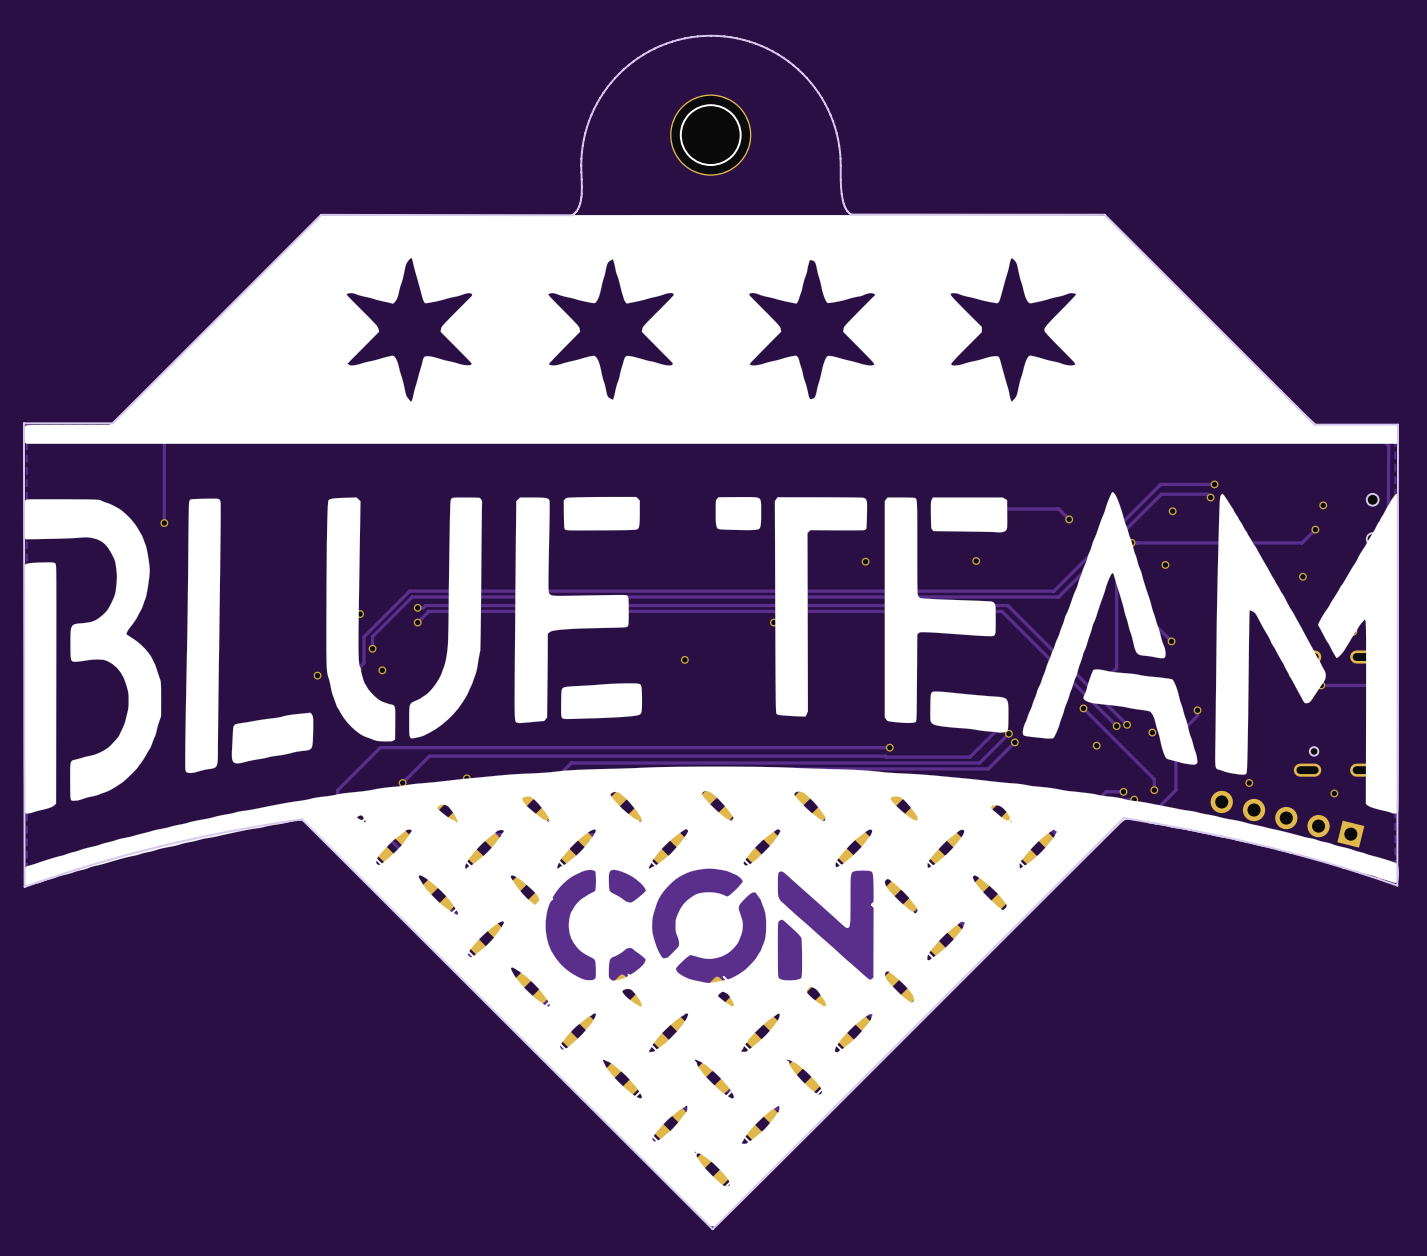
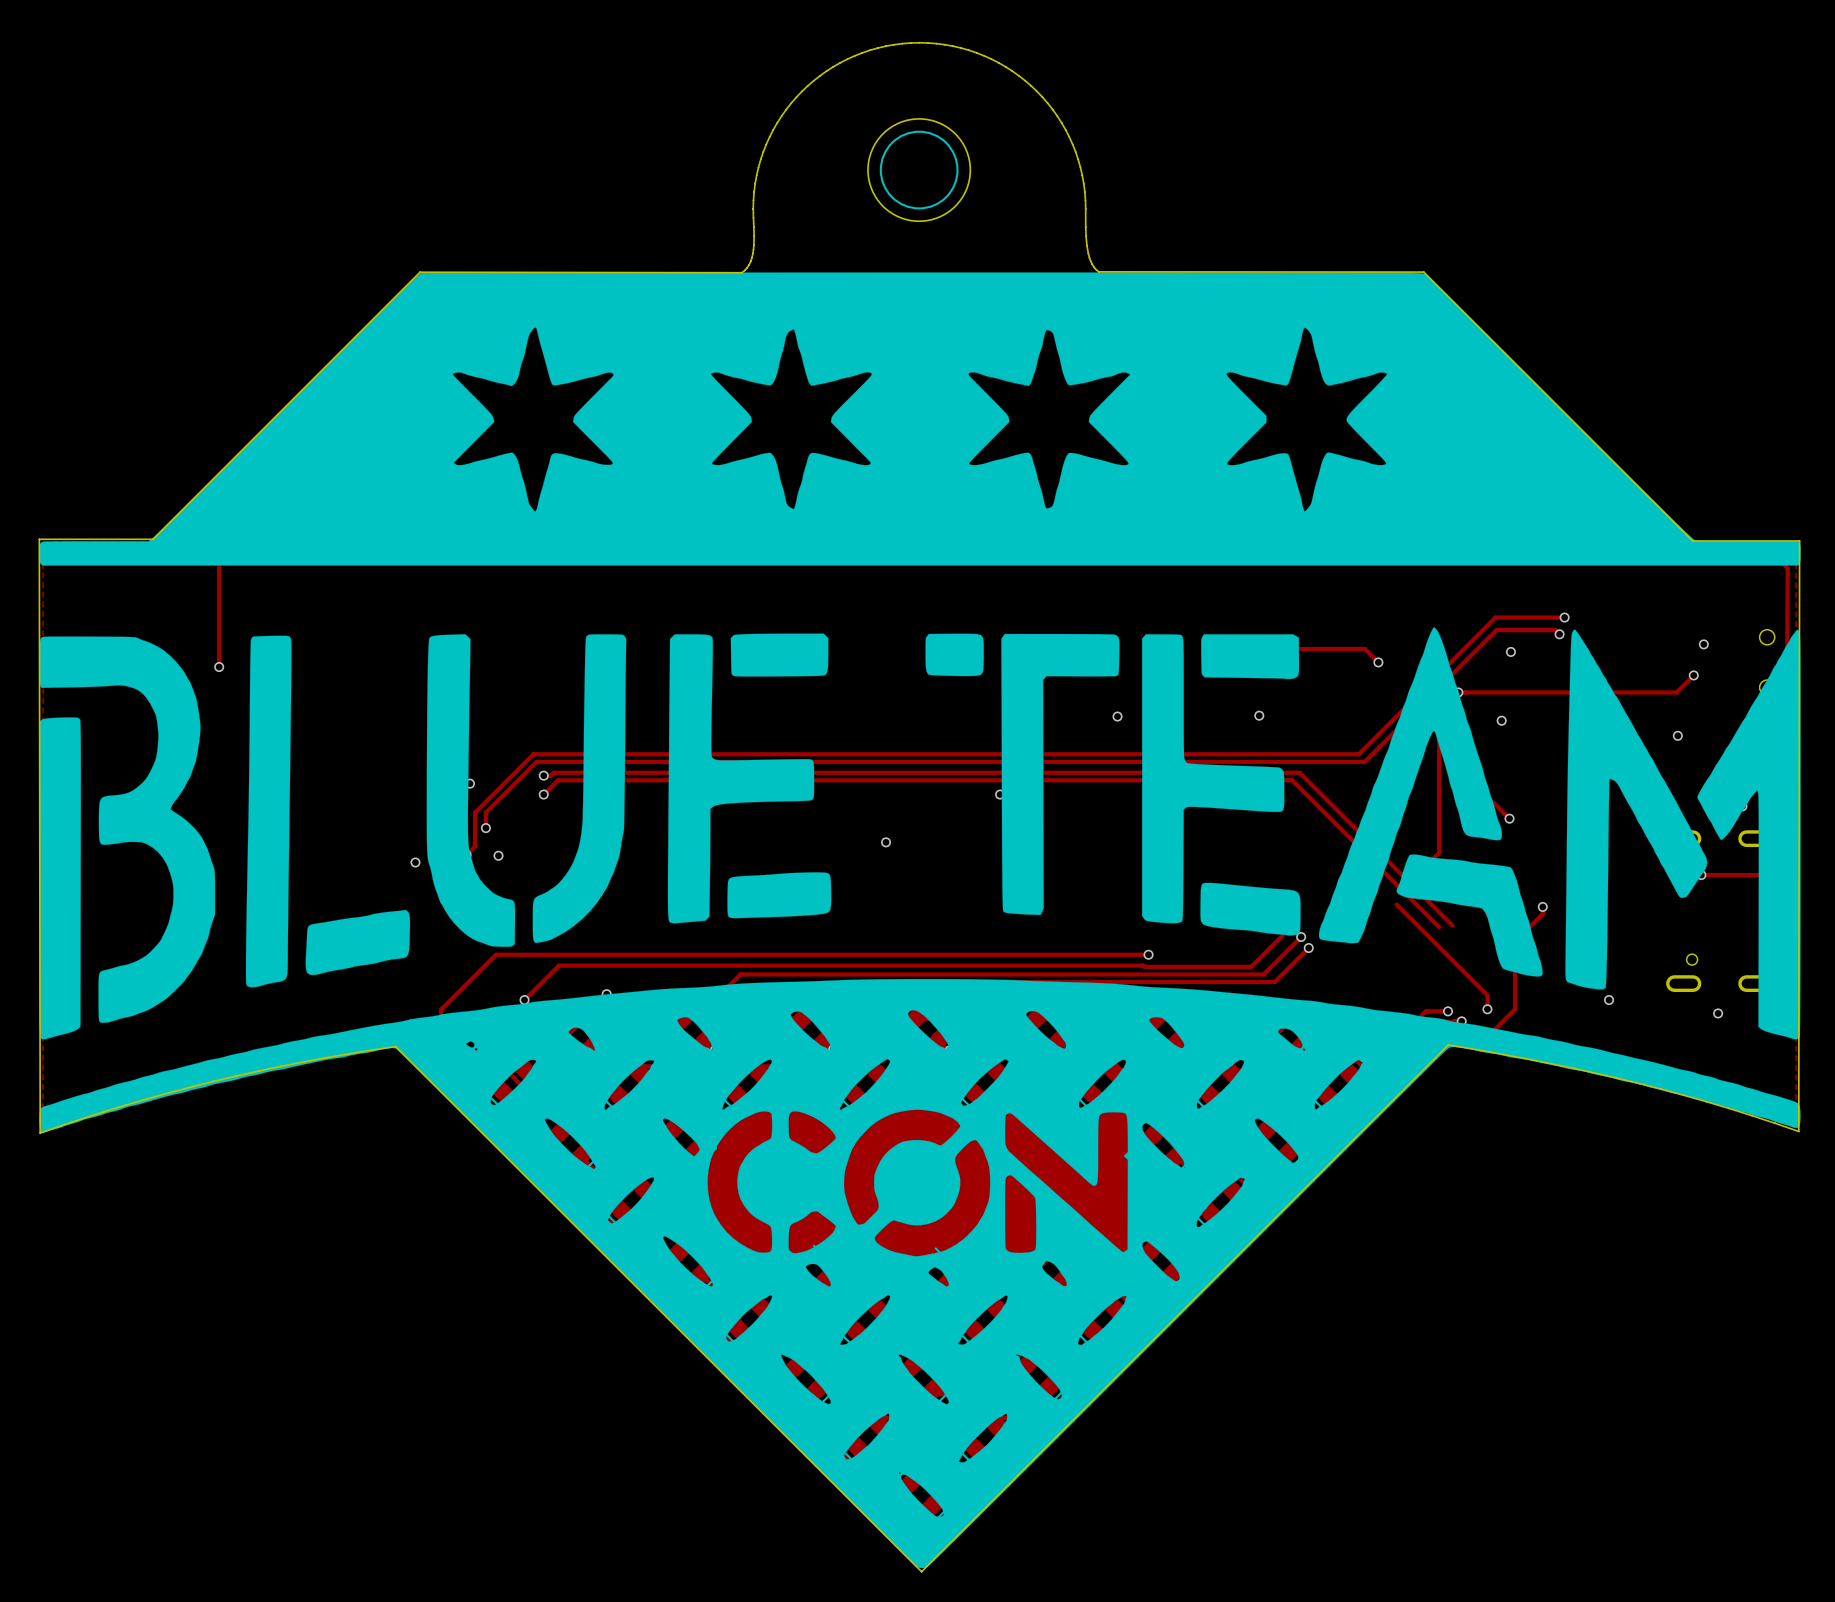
via: (1083, 708) -> none
via: (1127, 724) -> none
via: (1116, 726) -> none
via: (1152, 732) -> none
via: (1096, 745) -> none
part: (1287, 819) -> none

